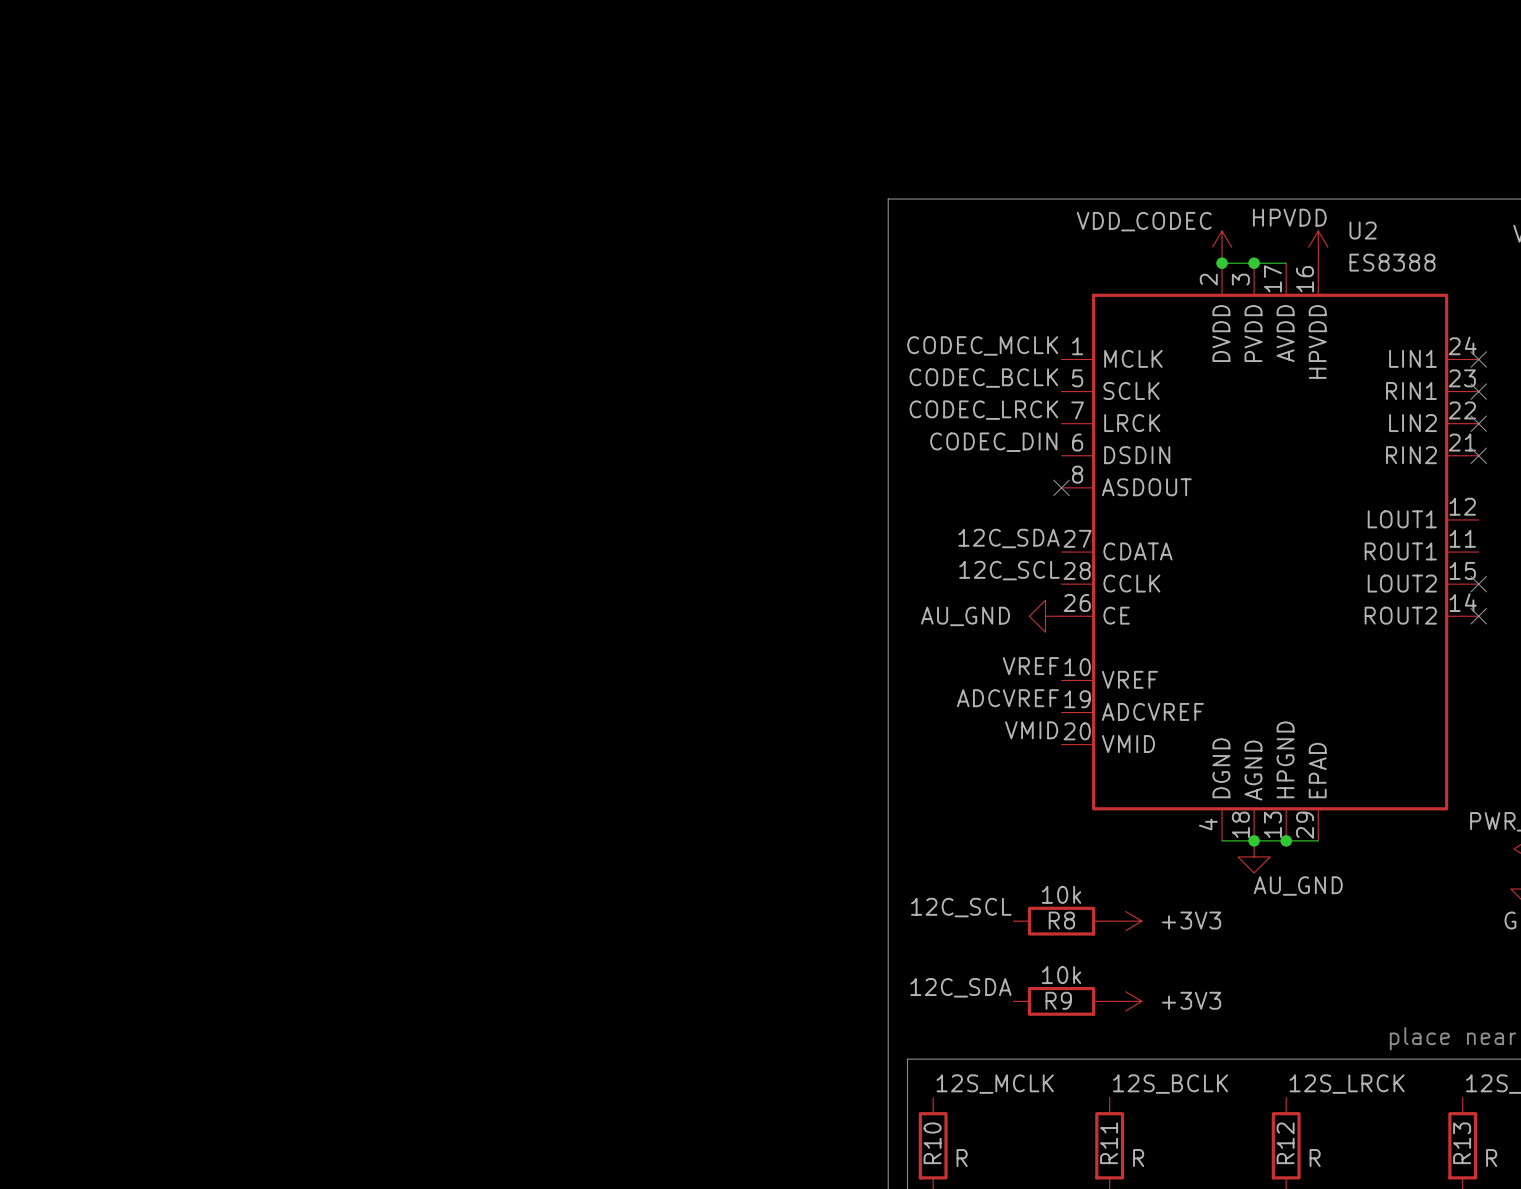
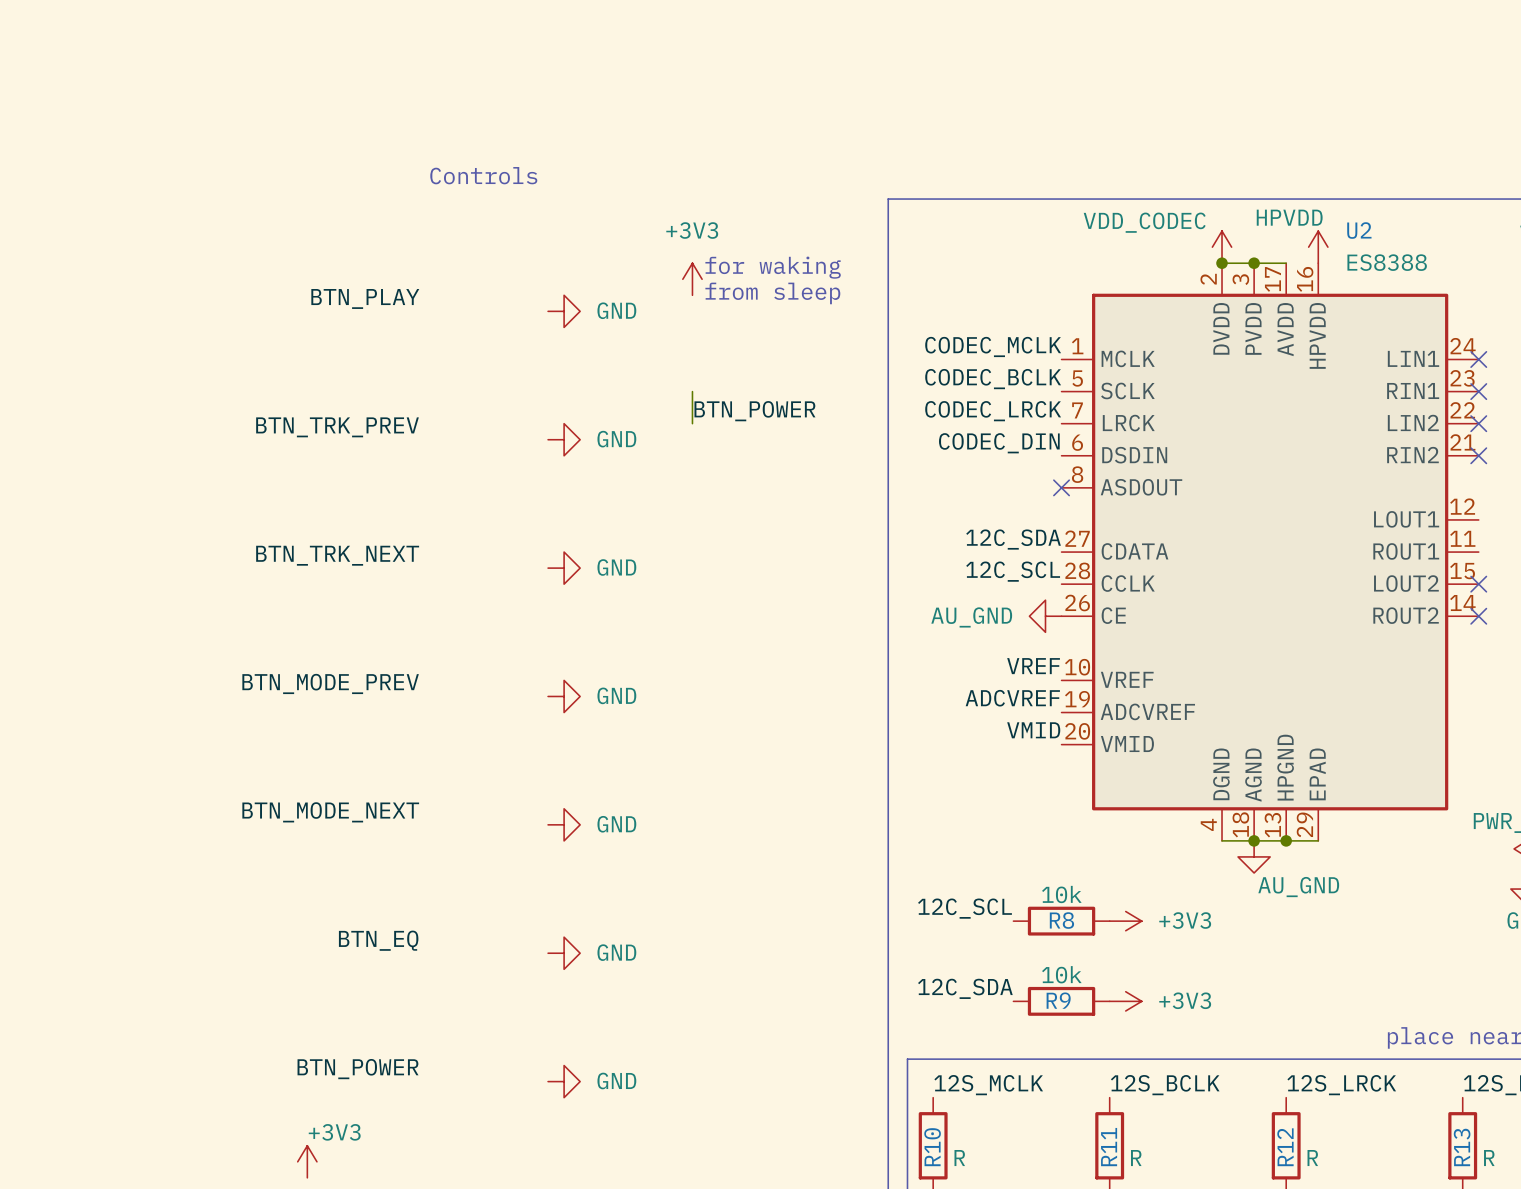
text: none -> Controls (483, 175)
text: none -> for waking (773, 267)
power symbol: none -> +3V3 (692, 279)
text: none -> from sleep (772, 293)
label: none -> BTN_PLAY (365, 298)
power symbol: none -> GND (564, 311)
wire: none -> (692, 391) (692, 423)
label: none -> BTN_POWER (754, 411)
label: none -> BTN_TRK_PREV (337, 427)
power symbol: none -> GND (564, 439)
label: none -> BTN_TRK_NEXT (337, 555)
power symbol: none -> GND (564, 568)
label: none -> BTN_MODE_PREV (330, 683)
power symbol: none -> GND (564, 696)
label: none -> BTN_MODE_NEXT (330, 812)
power symbol: none -> GND (564, 824)
label: none -> BTN_EQ (378, 940)
power symbol: none -> GND (564, 953)
label: none -> BTN_POWER (358, 1069)
power symbol: none -> GND (564, 1081)
power symbol: none -> +3V3 (307, 1161)

